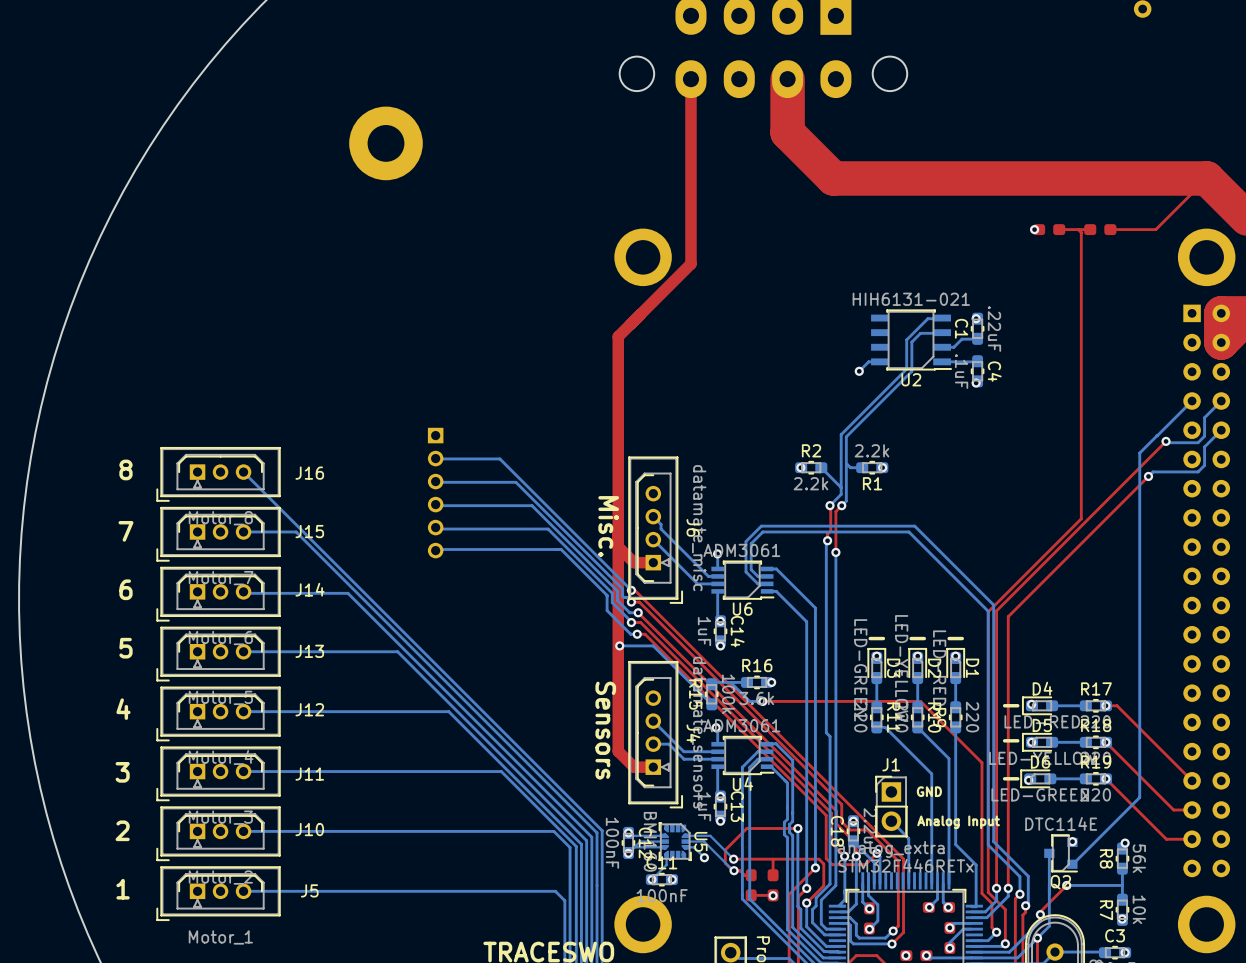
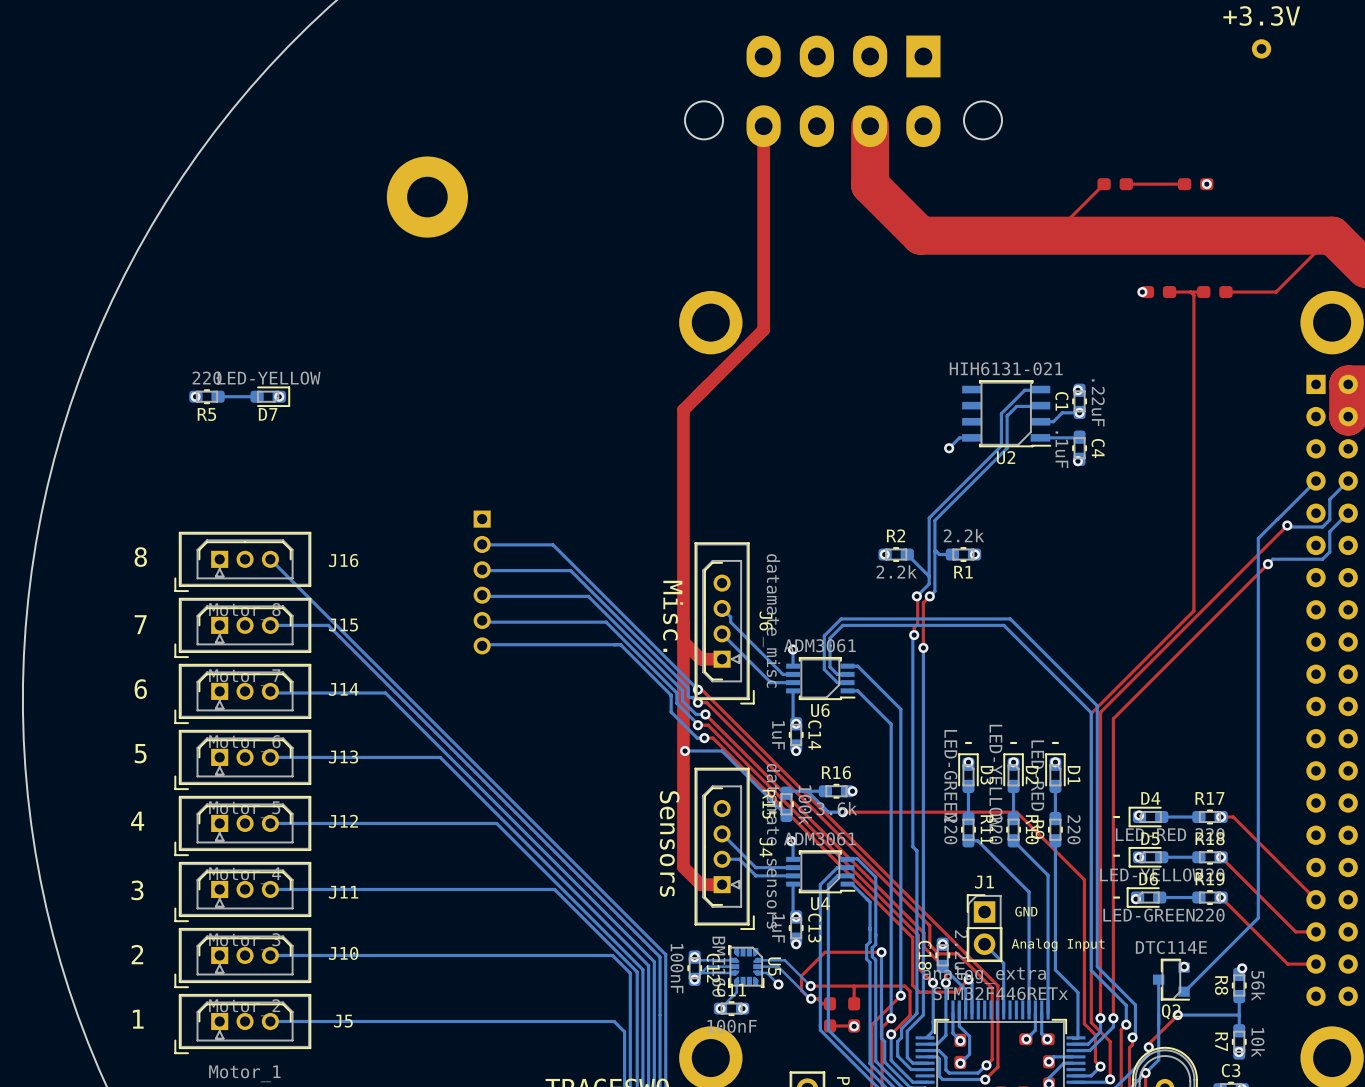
top track: none -> (1104, 184) (1055, 232) (1052, 232)
part: none -> (1115, 184)
top track: none -> (1184, 184) (1126, 184)
part: none -> (1195, 184)
via: none -> (1206, 184)
via: none -> (195, 396)
R5: none -> 220 (206, 396)
bottom track: none -> (257, 396) (218, 396)
D7: none -> LED-YELLOW (270, 396)
via: none -> (279, 396)
via: none -> (1079, 412)

